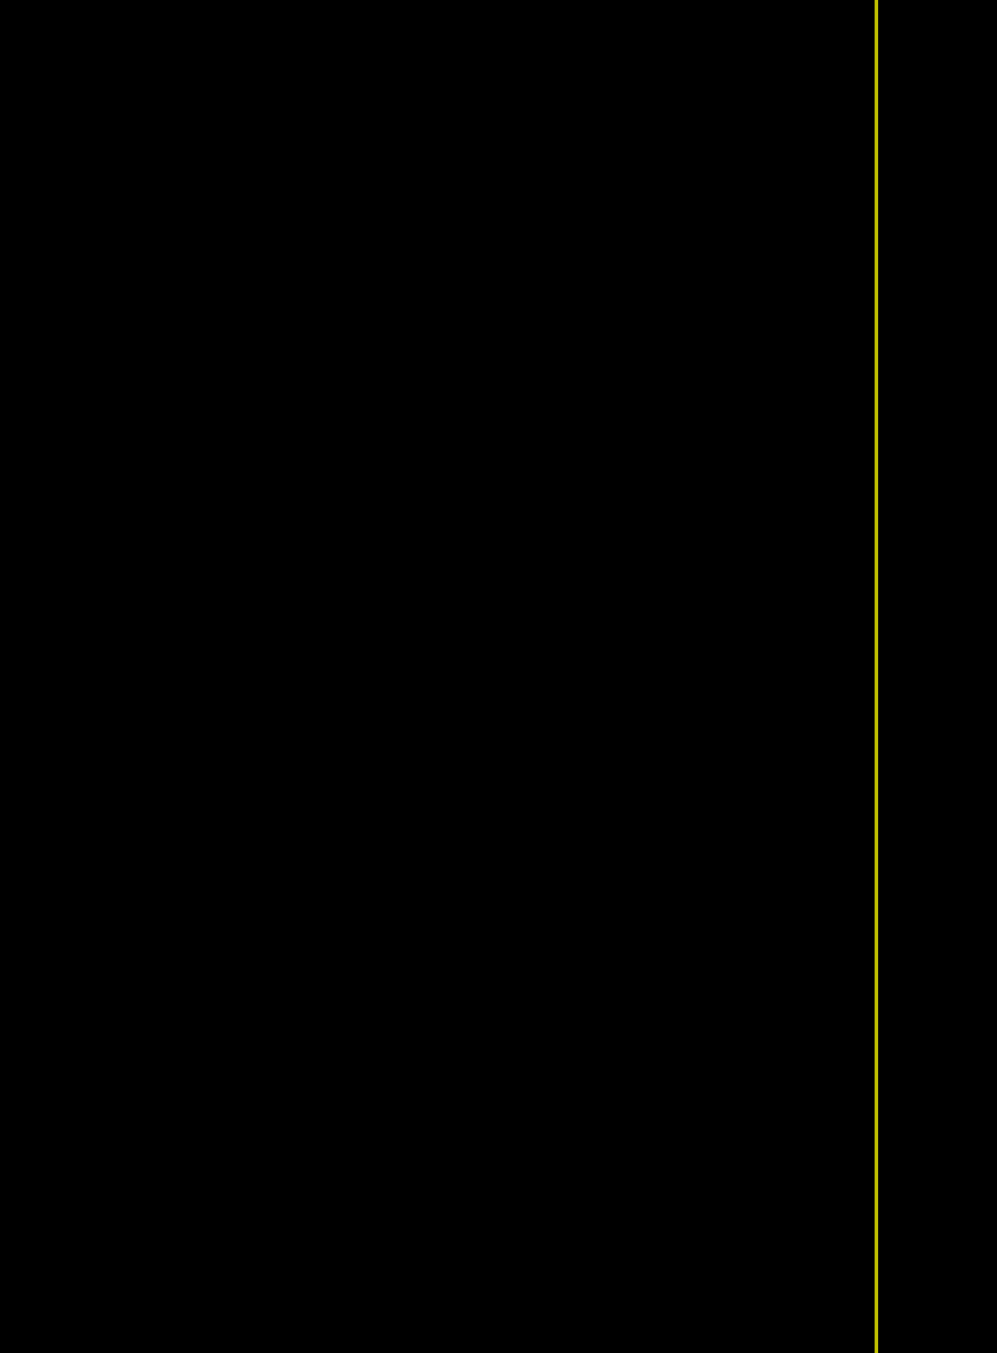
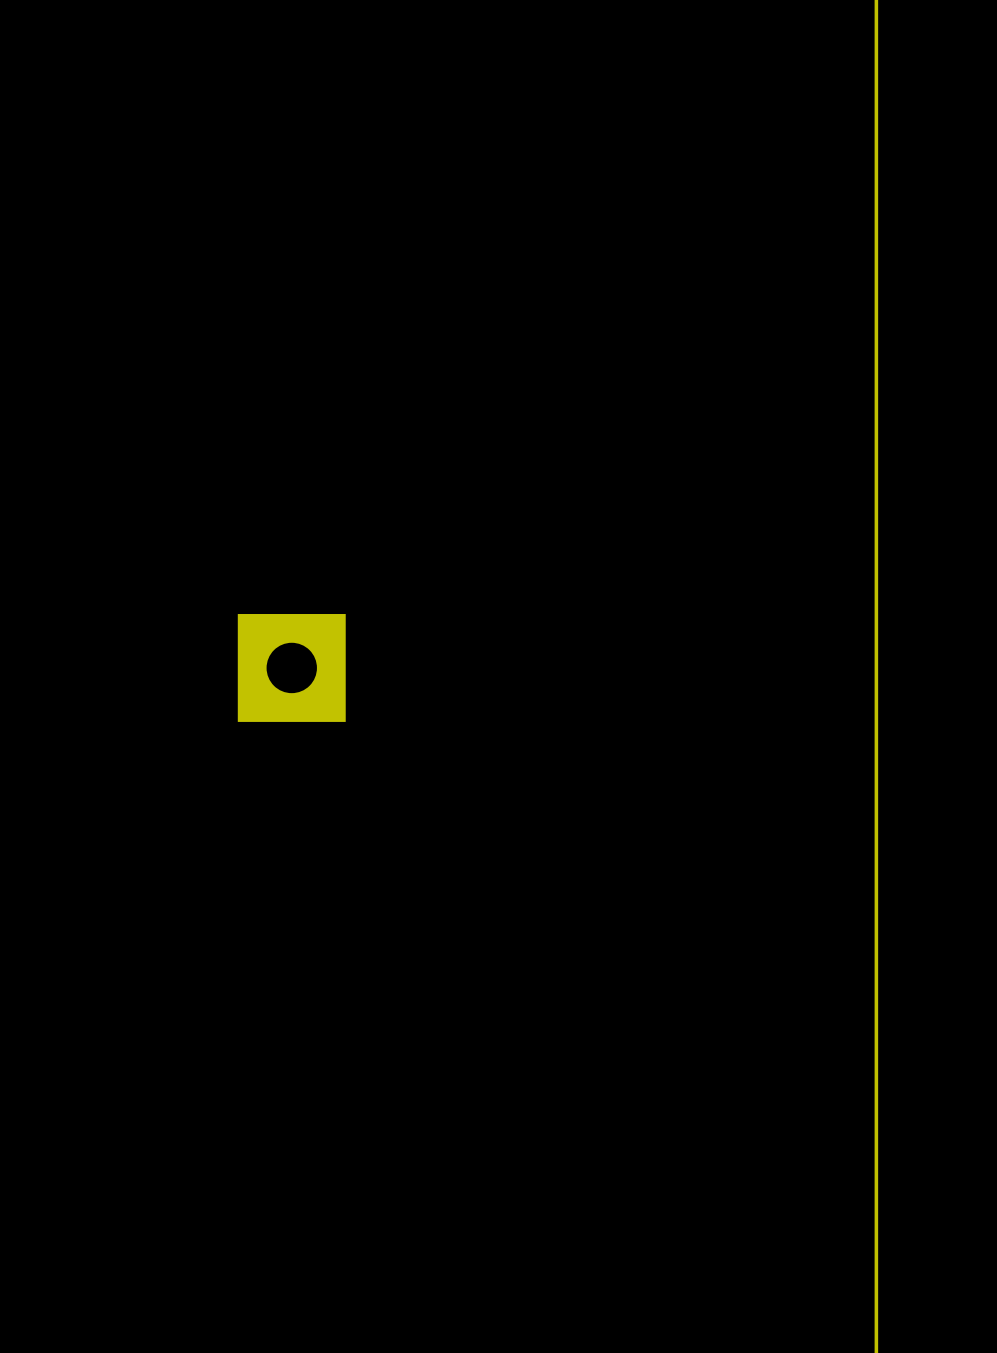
part: none -> (291, 667)

